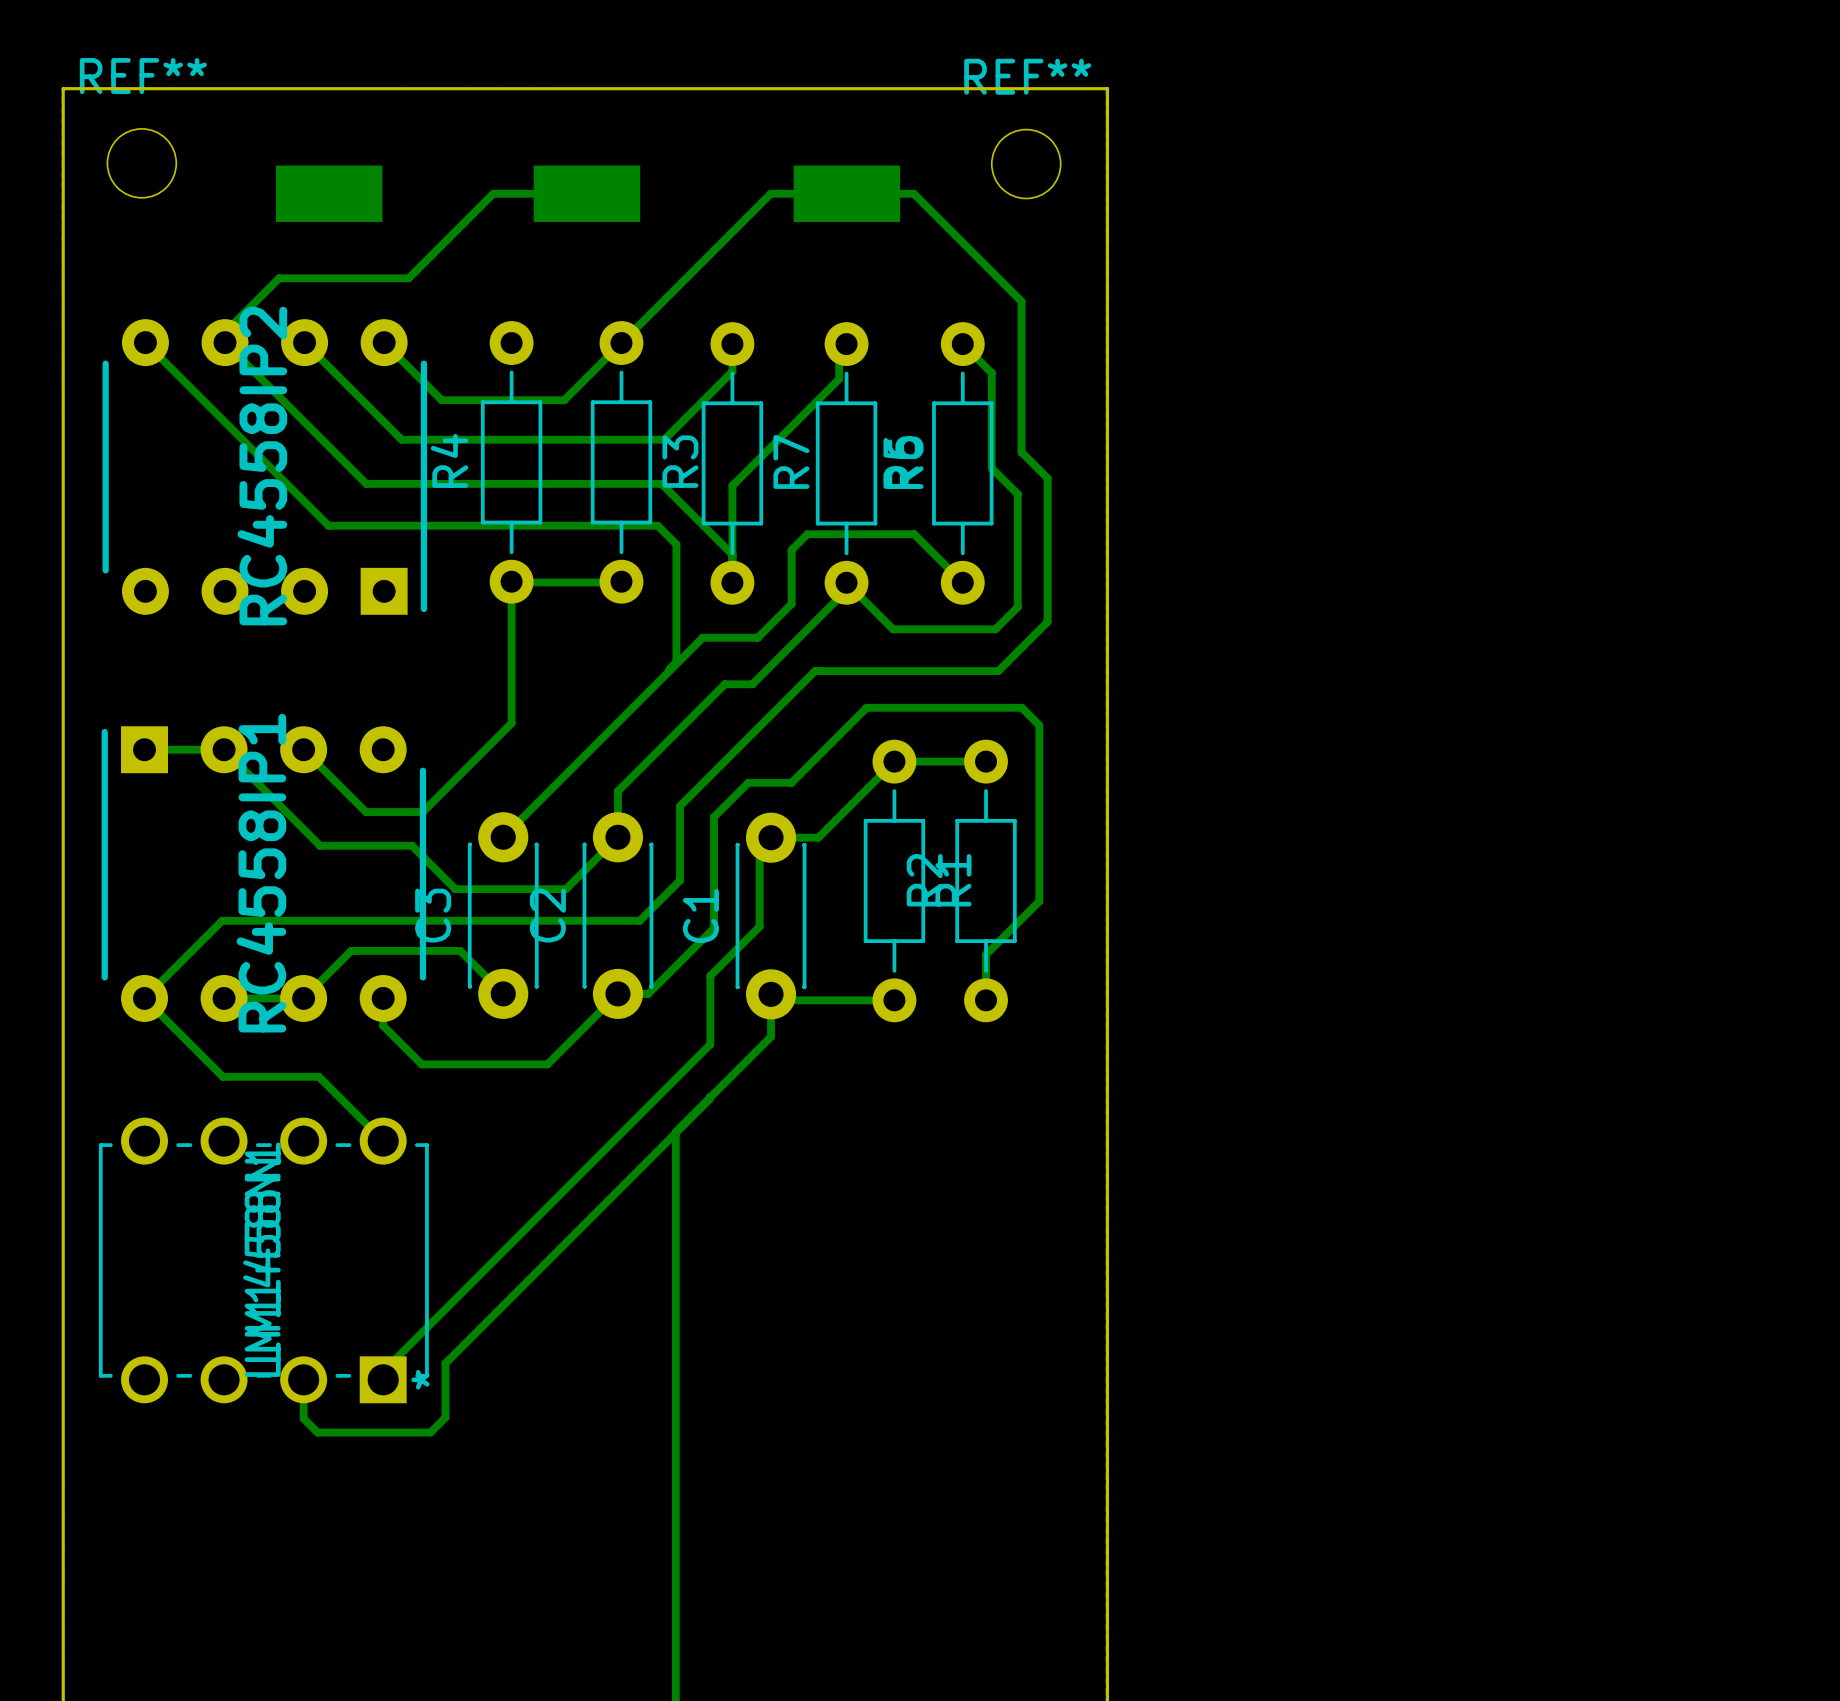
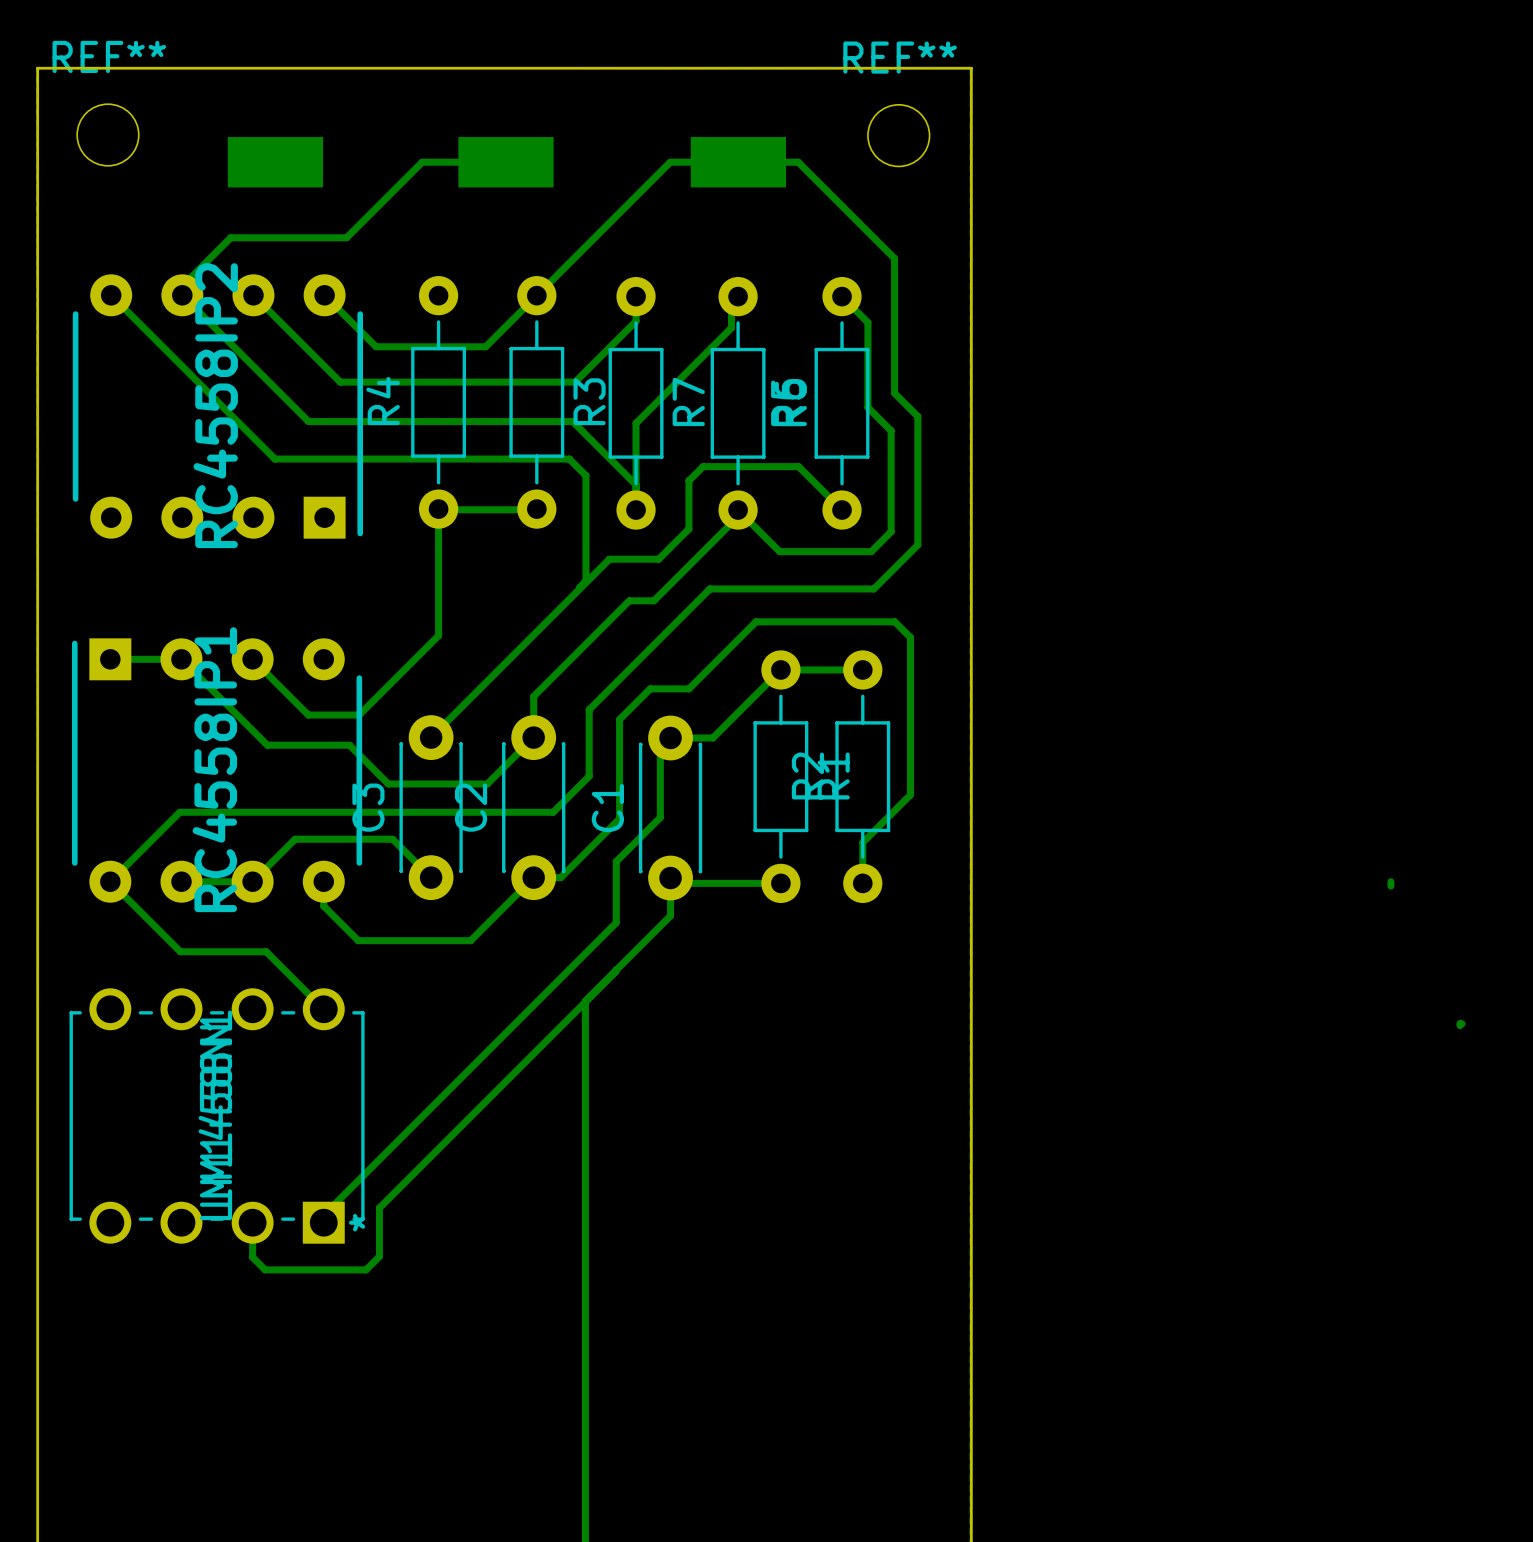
bottom track: none -> (1390, 881) (1390, 886)
bottom track: none -> (1462, 1023) (1460, 1025)

